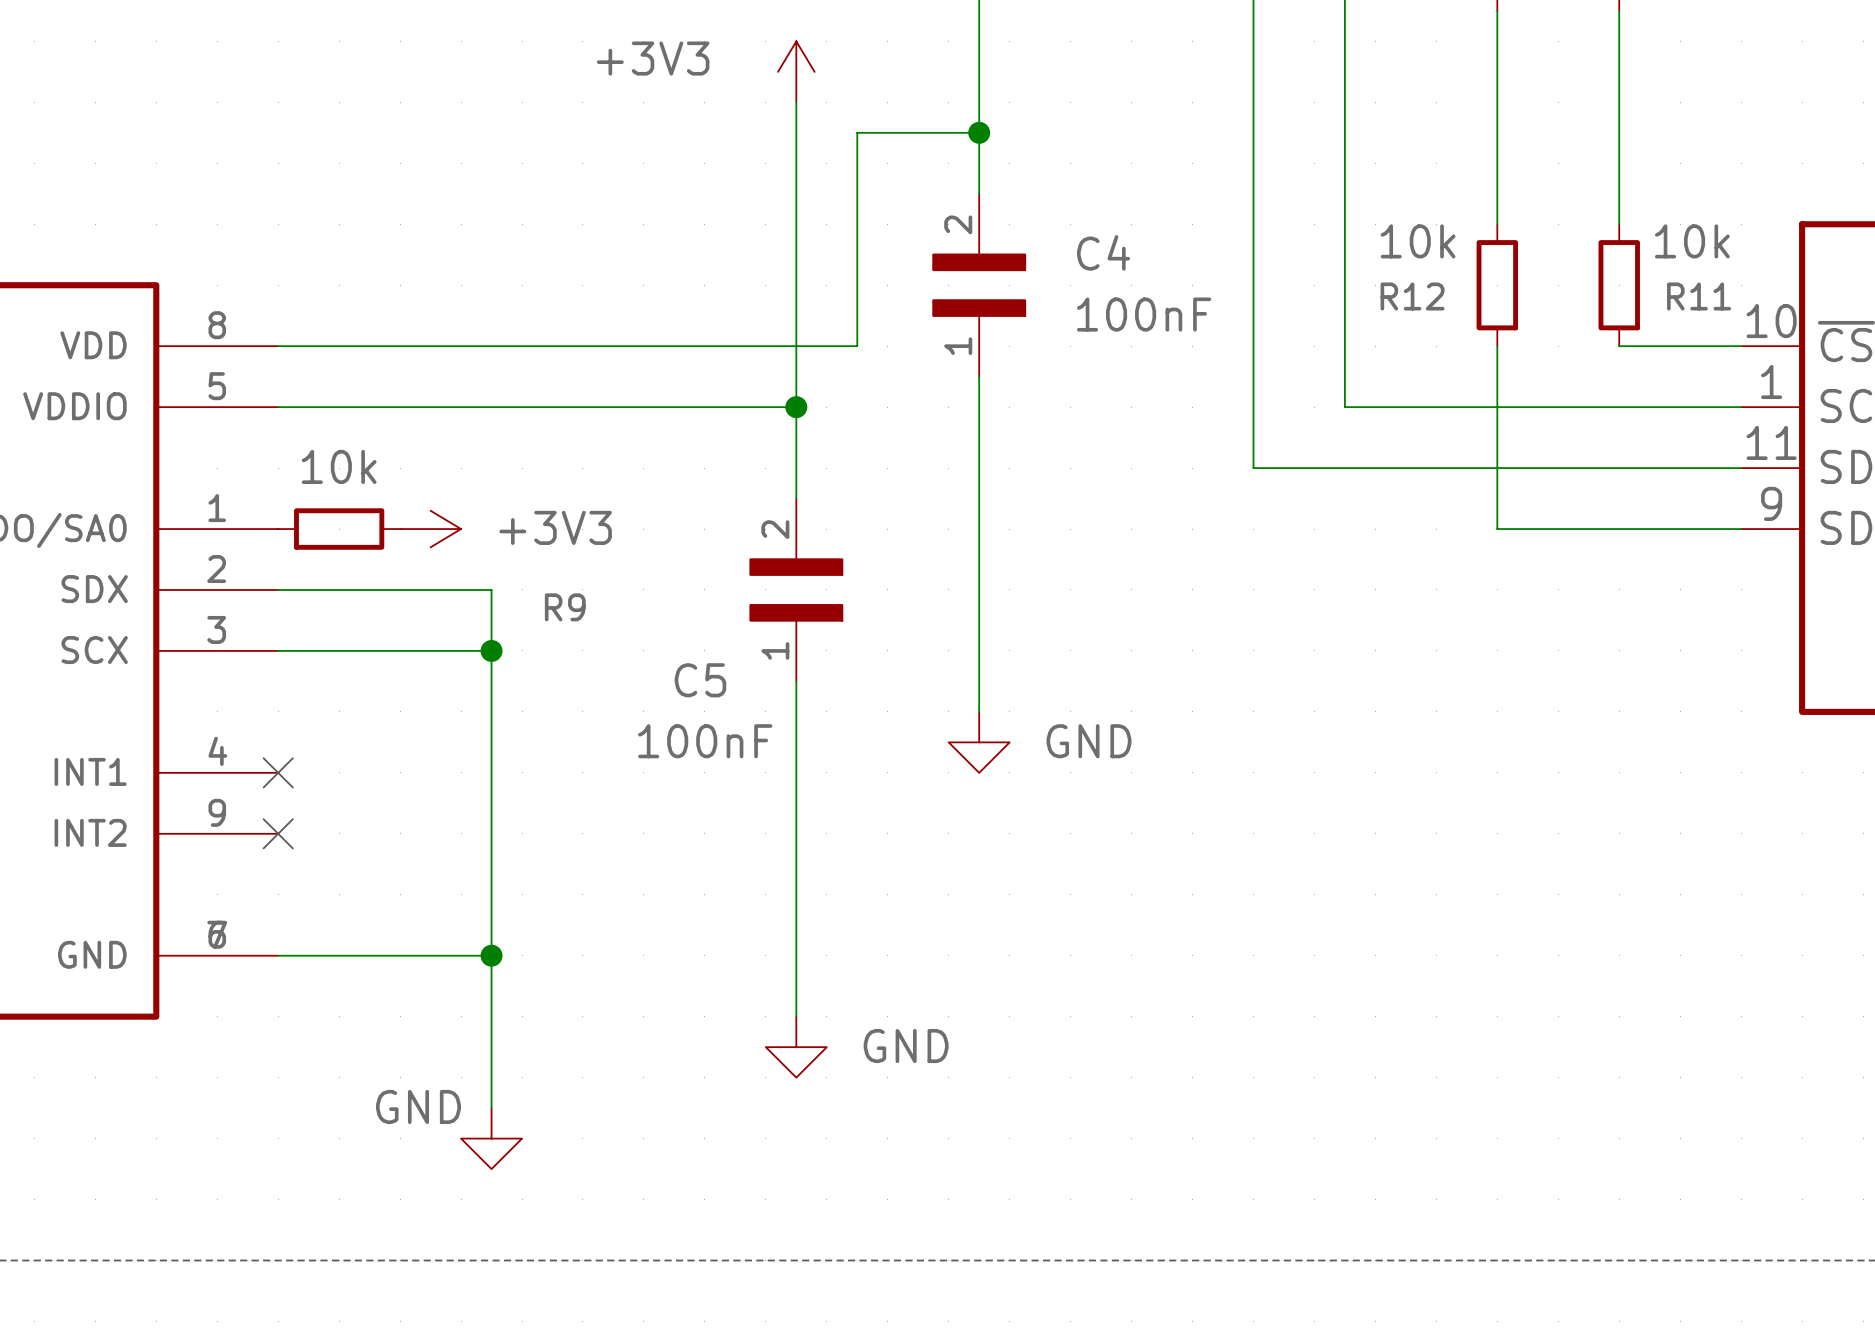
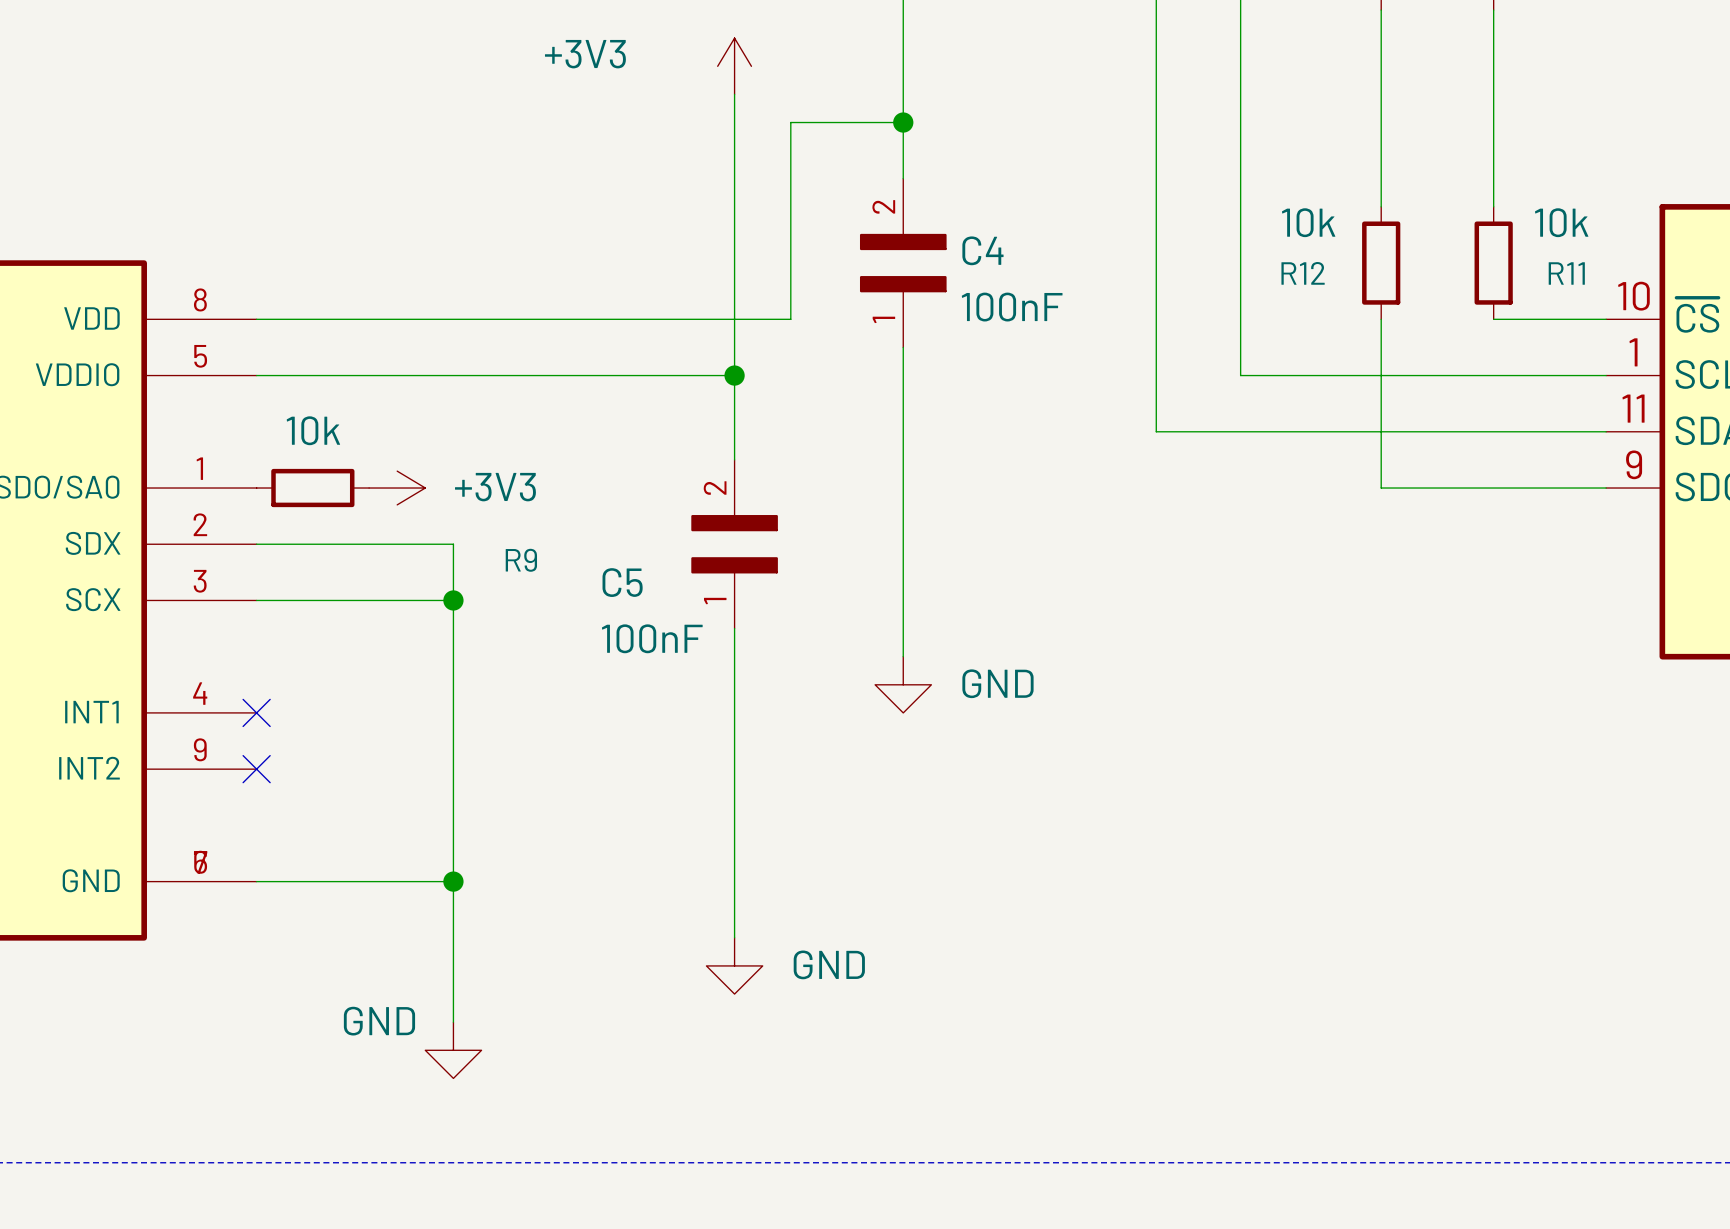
C4 name position: C4 (1103, 252) -> C4 (982, 250)
C4 value position: 100nF (1144, 314) -> 100nF (1012, 307)
C5 name position: C5 (700, 680) -> C5 (622, 582)
C5 value position: 100nF (705, 741) -> 100nF (652, 638)

